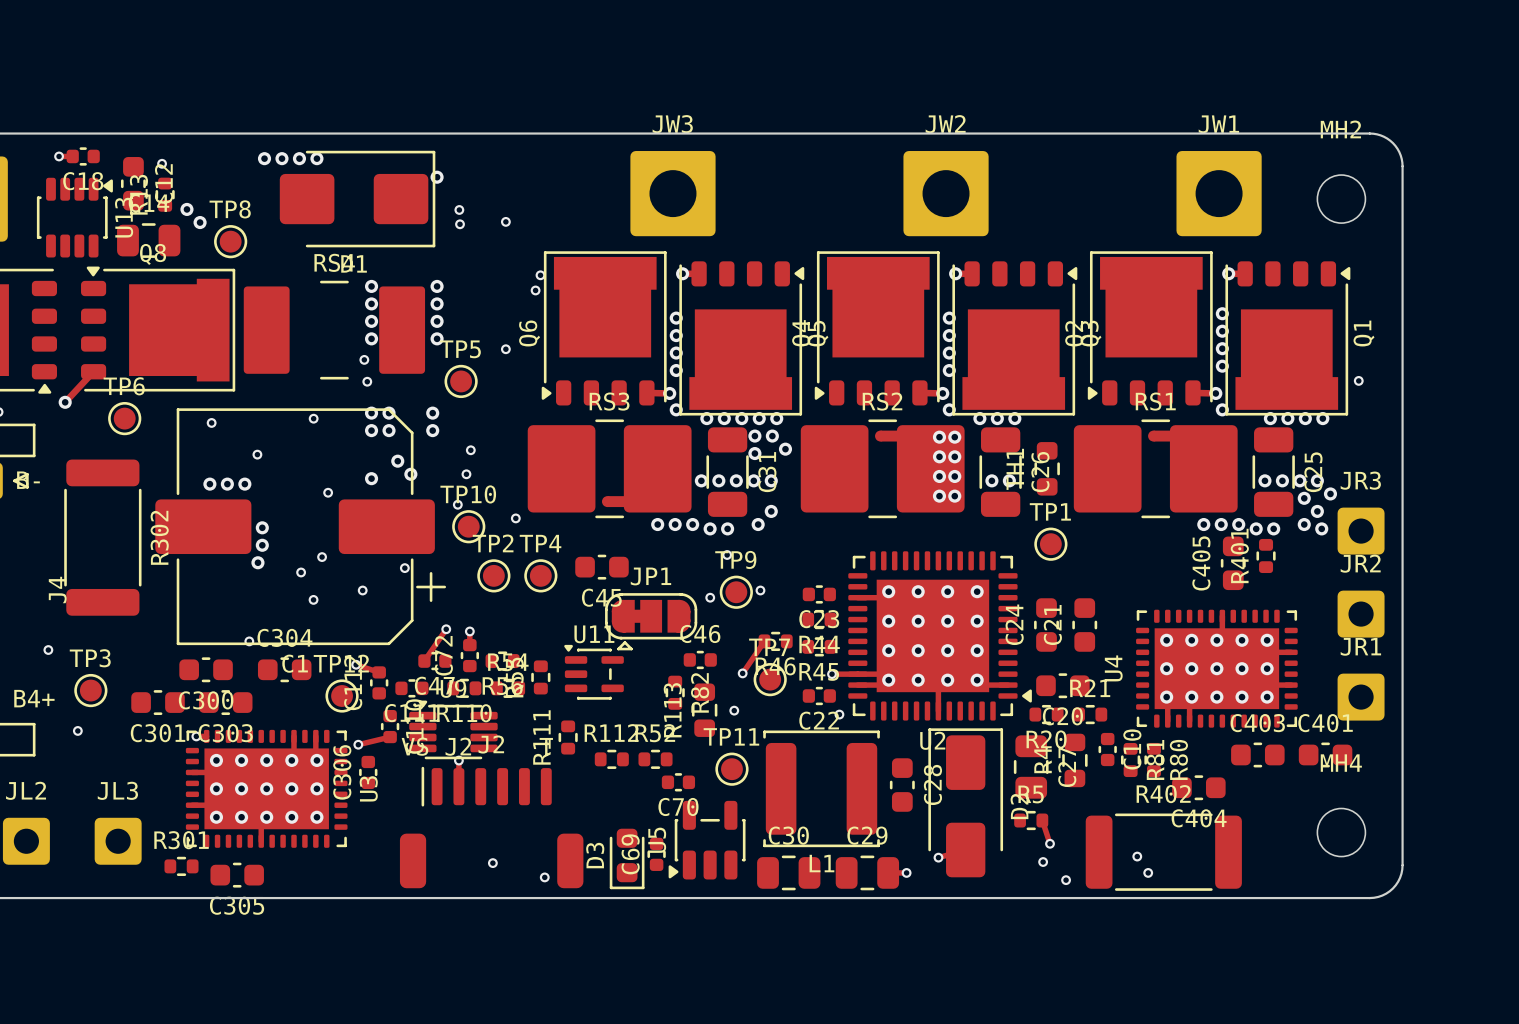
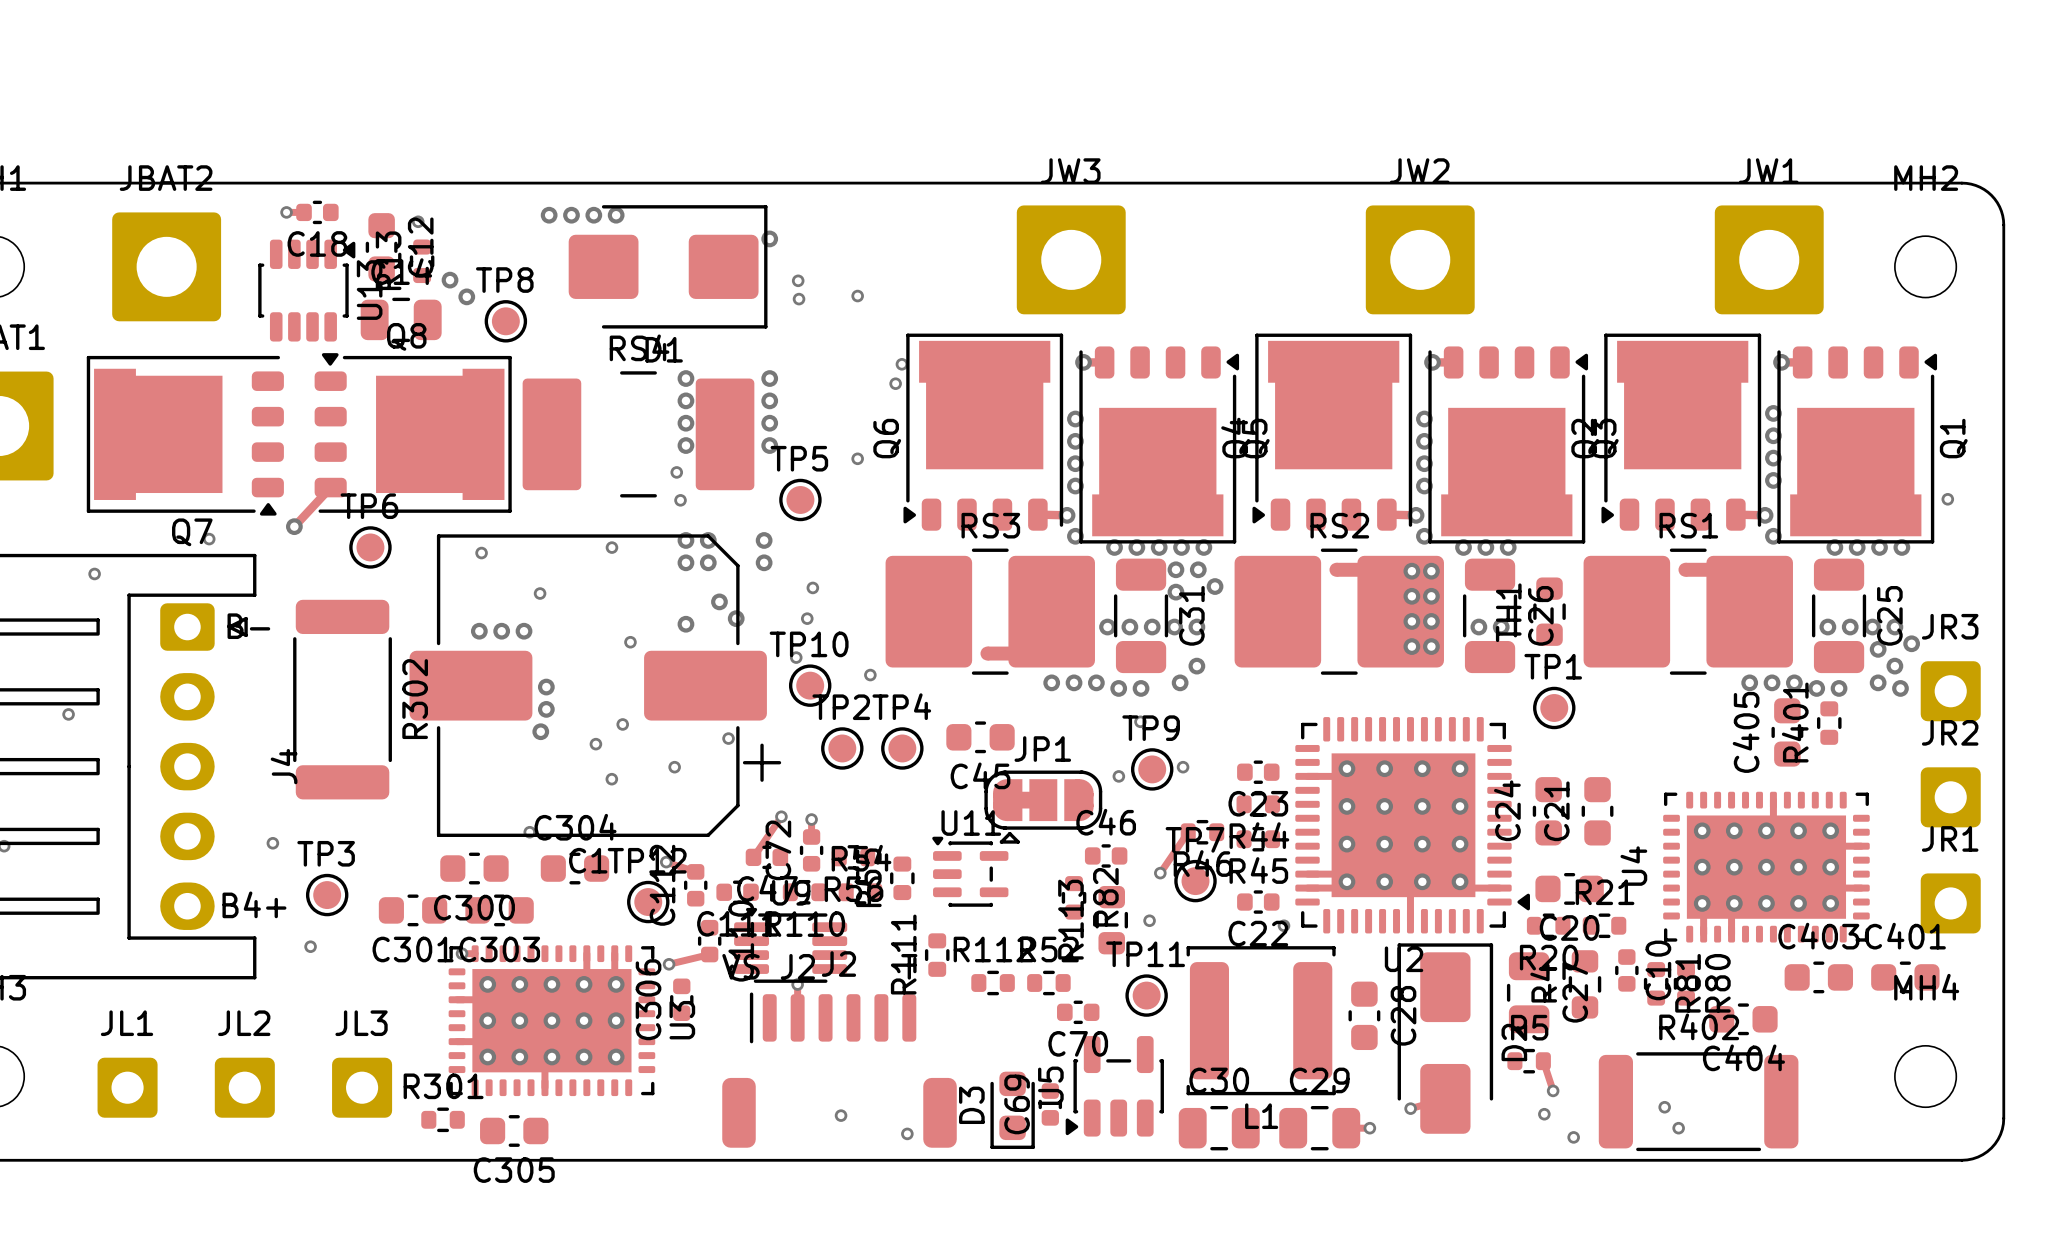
track: (832, 674) (857, 674) -> none
via: (832, 674) -> none

